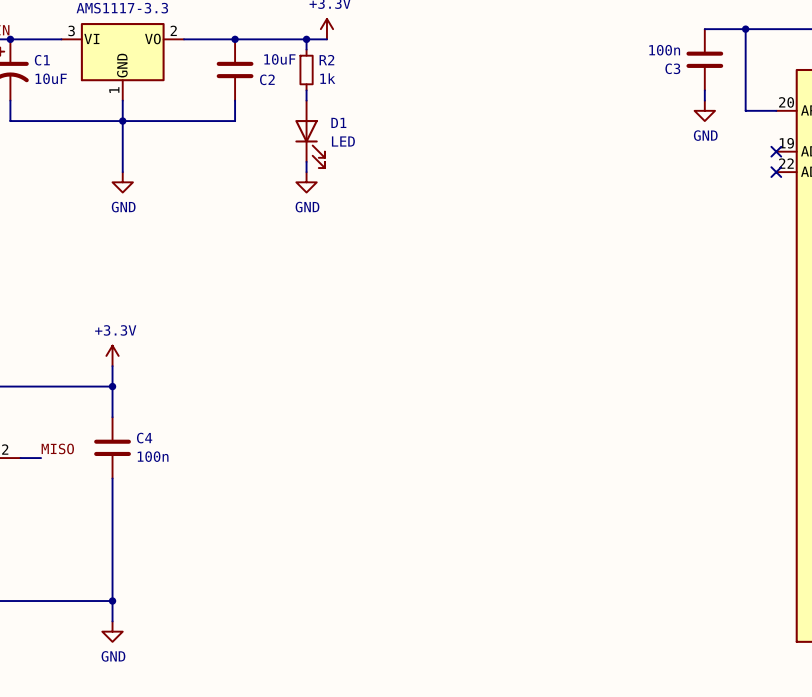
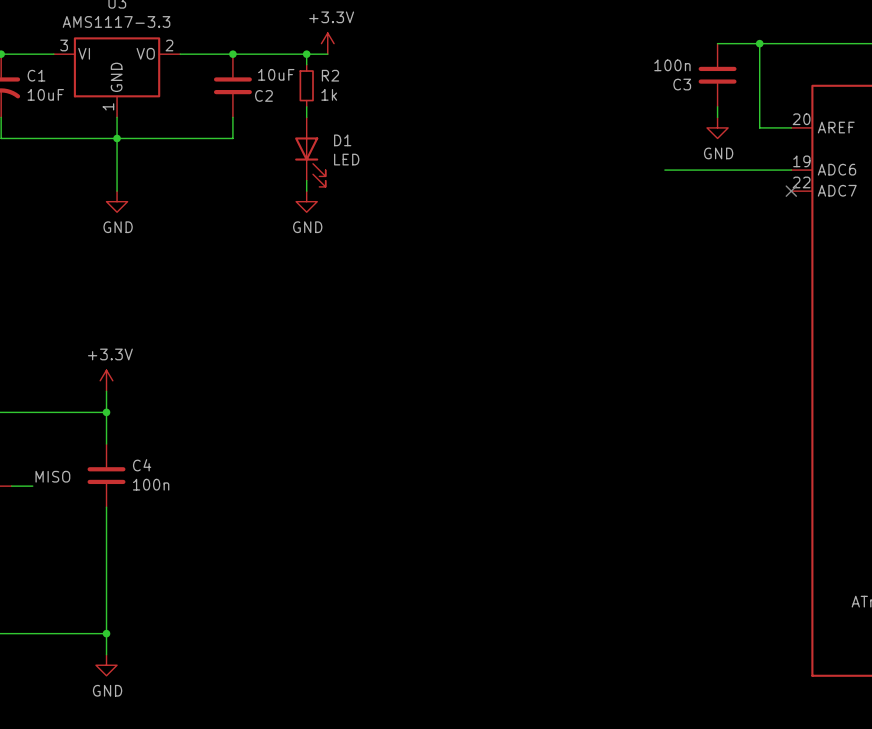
wire: none -> (664, 170) (791, 170)
no-connect mark: (776, 151) -> none

